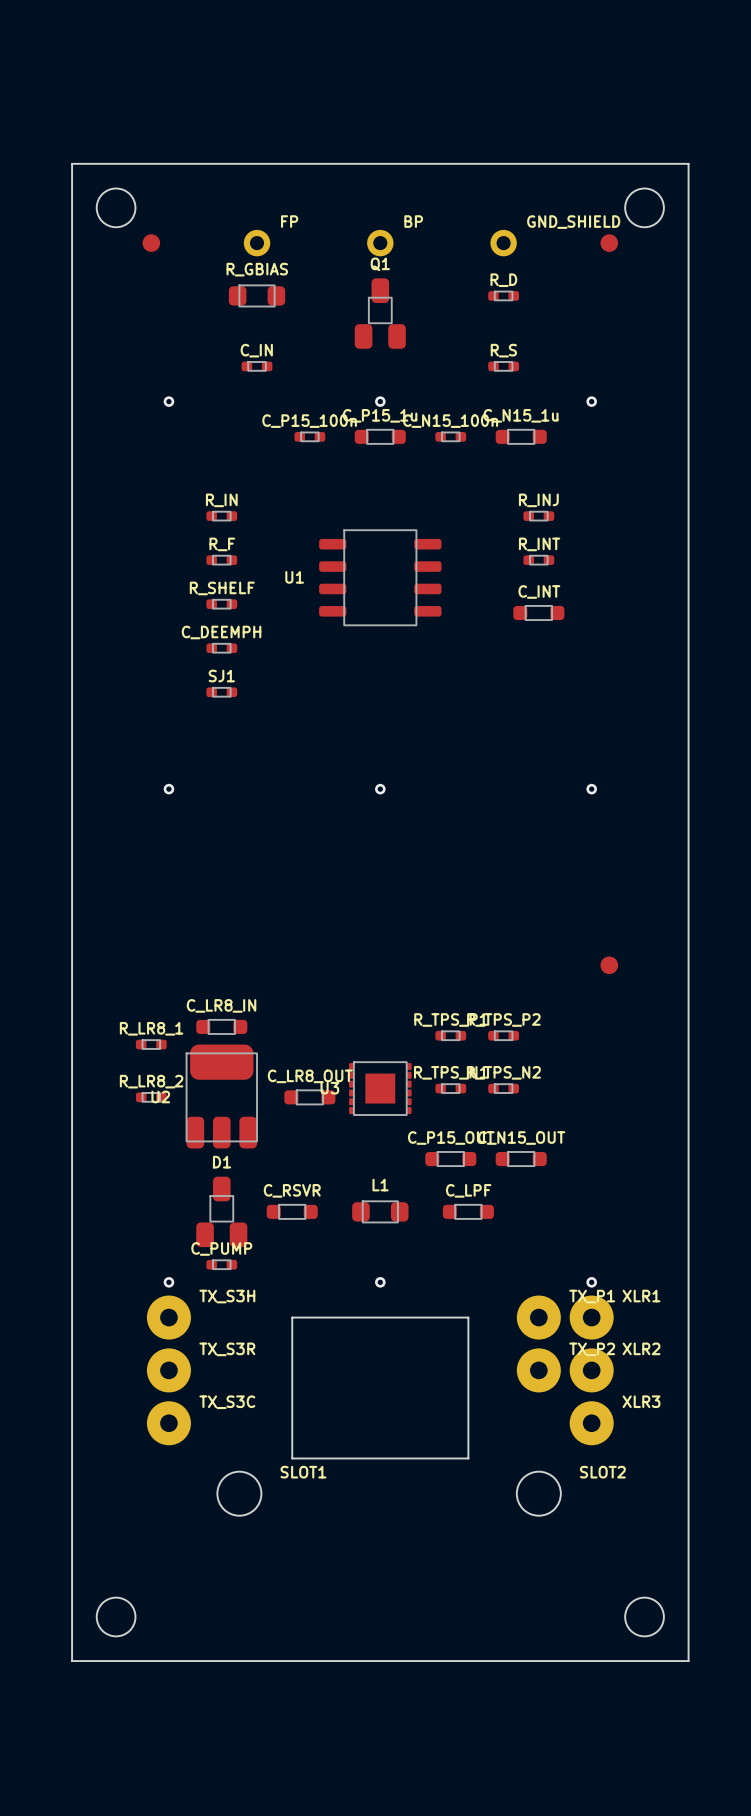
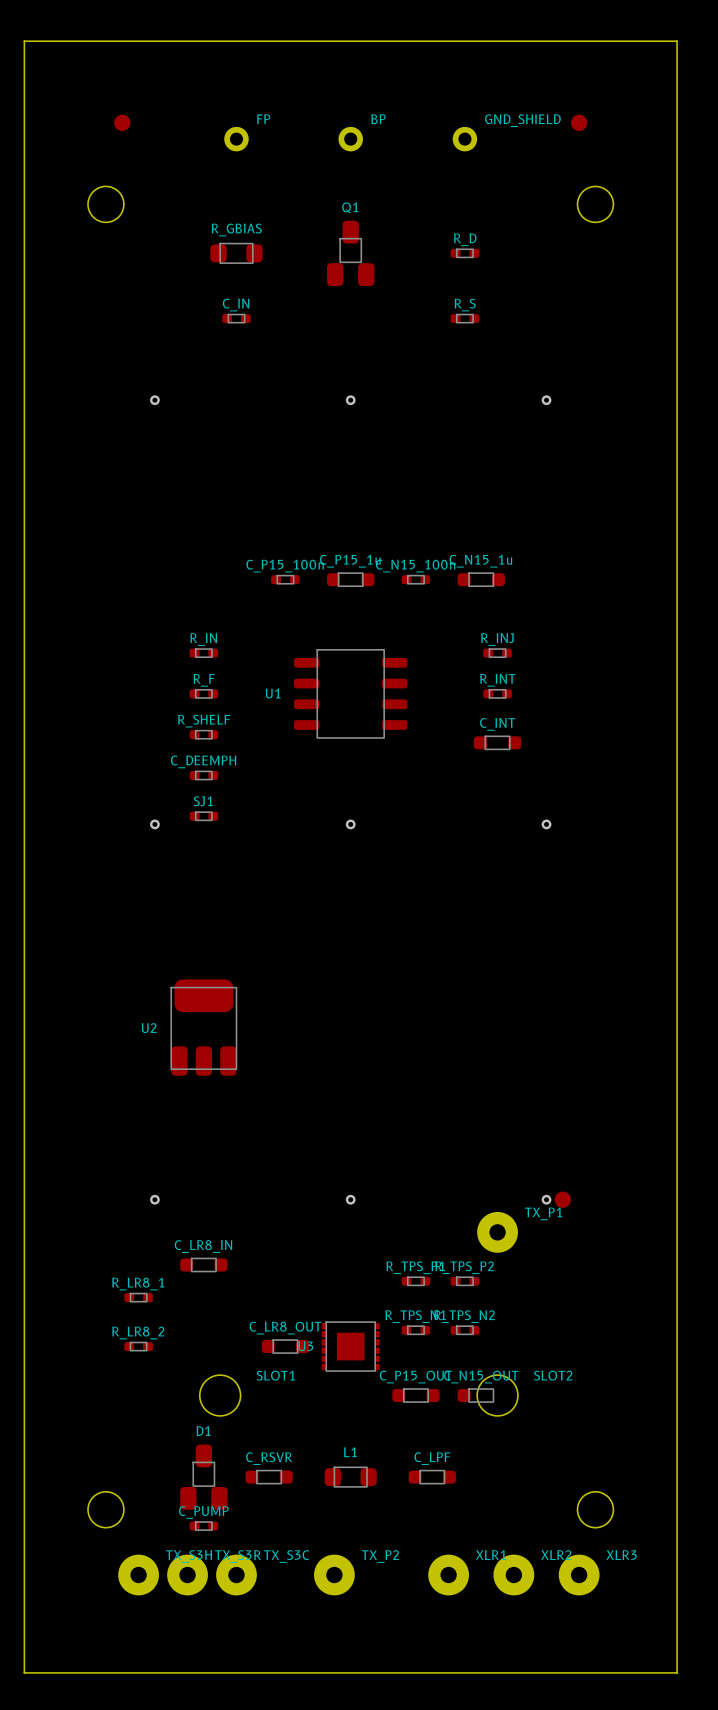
board edge: (72, 163) (688, 163) (688, 1661) (72, 1661) (72, 163) -> (24, 41) (24, 1672) (677, 1672) (677, 41) (24, 41)
part position: (151, 243) -> (122, 122)
FP position: (257, 243) -> (236, 139)
BP position: (380, 243) -> (350, 139)
GND_SHIELD position: (503, 243) -> (464, 139)
part position: (609, 243) -> (579, 122)
R_GBIAS position: (257, 295) -> (236, 253)
R_D position: (503, 295) -> (464, 253)
Q1 position: (380, 313) -> (350, 253)
C_IN position: (257, 366) -> (236, 318)
R_S position: (503, 366) -> (464, 318)
via position: (168, 401) -> (154, 400)
via position: (380, 401) -> (350, 400)
via position: (591, 401) -> (546, 400)
C_P15_100n position: (309, 436) -> (285, 579)
C_P15_1u position: (380, 436) -> (350, 579)
C_N15_100n position: (450, 436) -> (415, 579)
C_N15_1u position: (521, 436) -> (481, 579)
R_IN: (221, 516) -> none
R_INJ position: (538, 516) -> (497, 653)
R_F position: (221, 560) -> (203, 693)
R_INT position: (538, 560) -> (497, 693)
U1 position: (380, 577) -> (350, 693)
R_SHELF position: (221, 604) -> (203, 734)
C_INT position: (538, 612) -> (497, 742)
C_DEEMPH position: (221, 648) -> (203, 775)
SJ1 name: SJ1 (221, 676) -> R_IN (203, 639)
via position: (168, 789) -> (154, 824)
via position: (380, 789) -> (350, 824)
via position: (591, 789) -> (546, 824)
SJ1: none -> (203, 816)
part position: (609, 965) -> (562, 1199)
C_LR8_IN position: (221, 1026) -> (203, 1264)
R_TPS_P1 position: (450, 1035) -> (415, 1281)
R_TPS_P2 position: (503, 1035) -> (464, 1281)
R_LR8_1 position: (151, 1044) -> (138, 1297)
U3 position: (380, 1088) -> (350, 1346)
R_TPS_N1 position: (450, 1088) -> (415, 1330)
R_TPS_N2 position: (503, 1088) -> (464, 1330)
R_LR8_2 position: (151, 1097) -> (138, 1346)
C_LR8_OUT position: (309, 1097) -> (285, 1346)
C_P15_OUT position: (450, 1159) -> (415, 1395)
C_N15_OUT position: (521, 1159) -> (481, 1395)
D1 position: (221, 1211) -> (203, 1477)
C_RSVR position: (292, 1211) -> (269, 1477)
L1 position: (380, 1211) -> (350, 1477)
C_LPF position: (468, 1211) -> (432, 1477)
C_PUMP position: (221, 1264) -> (203, 1526)
TX_S3H position: (168, 1317) -> (138, 1575)
board edge: (292, 1317) (468, 1317) (468, 1458) (292, 1458) (292, 1317) -> none
XLR1 position: (591, 1317) -> (448, 1575)
TX_S3R position: (168, 1370) -> (187, 1575)
TX_P2 position: (538, 1370) -> (334, 1575)
XLR2 position: (591, 1370) -> (513, 1575)
TX_S3C position: (168, 1423) -> (236, 1575)
XLR3 position: (591, 1423) -> (579, 1575)

